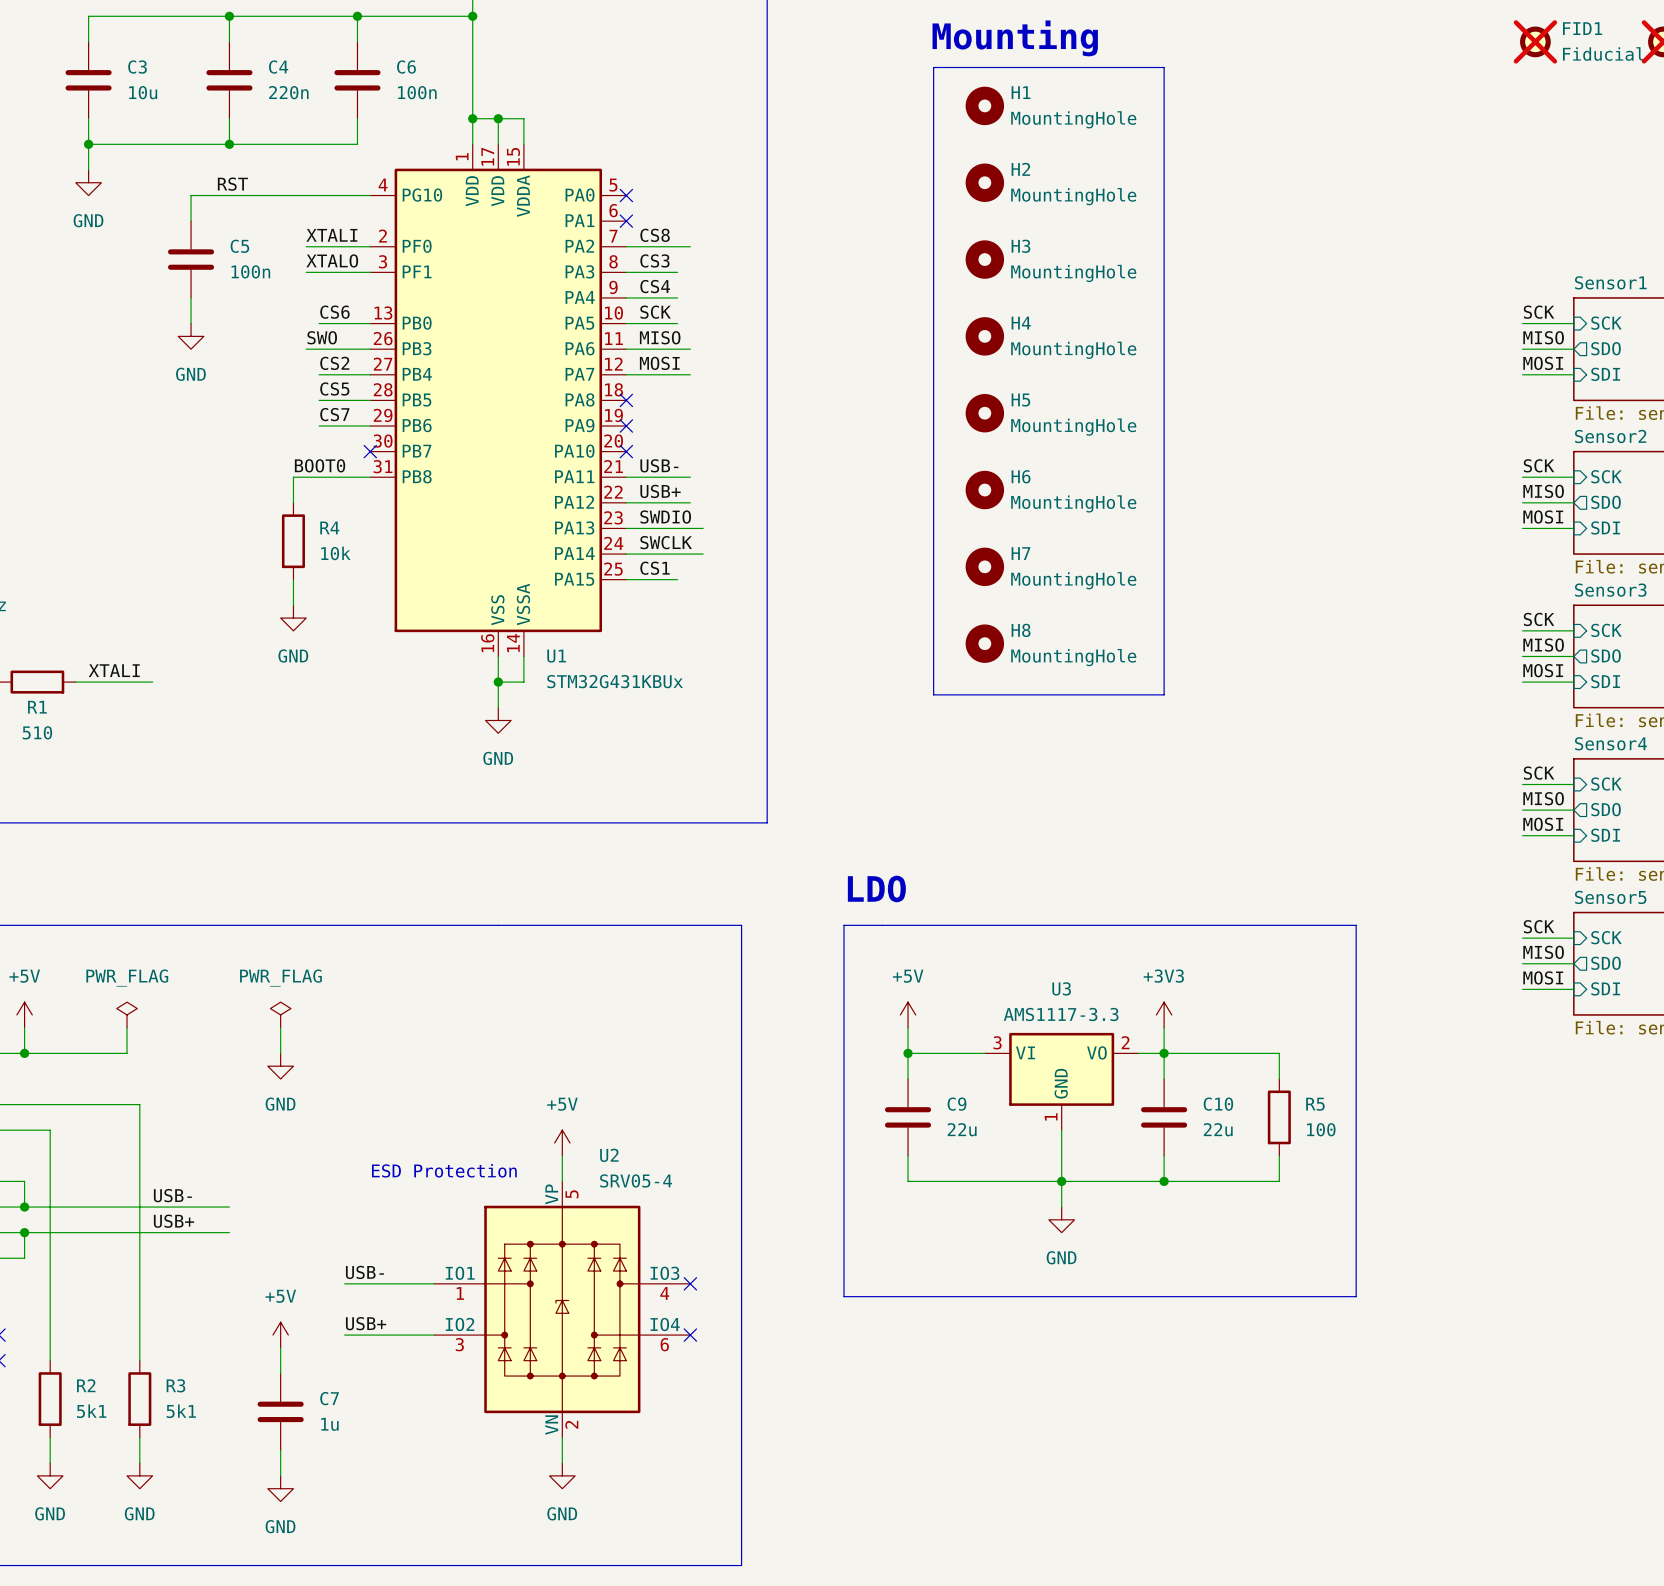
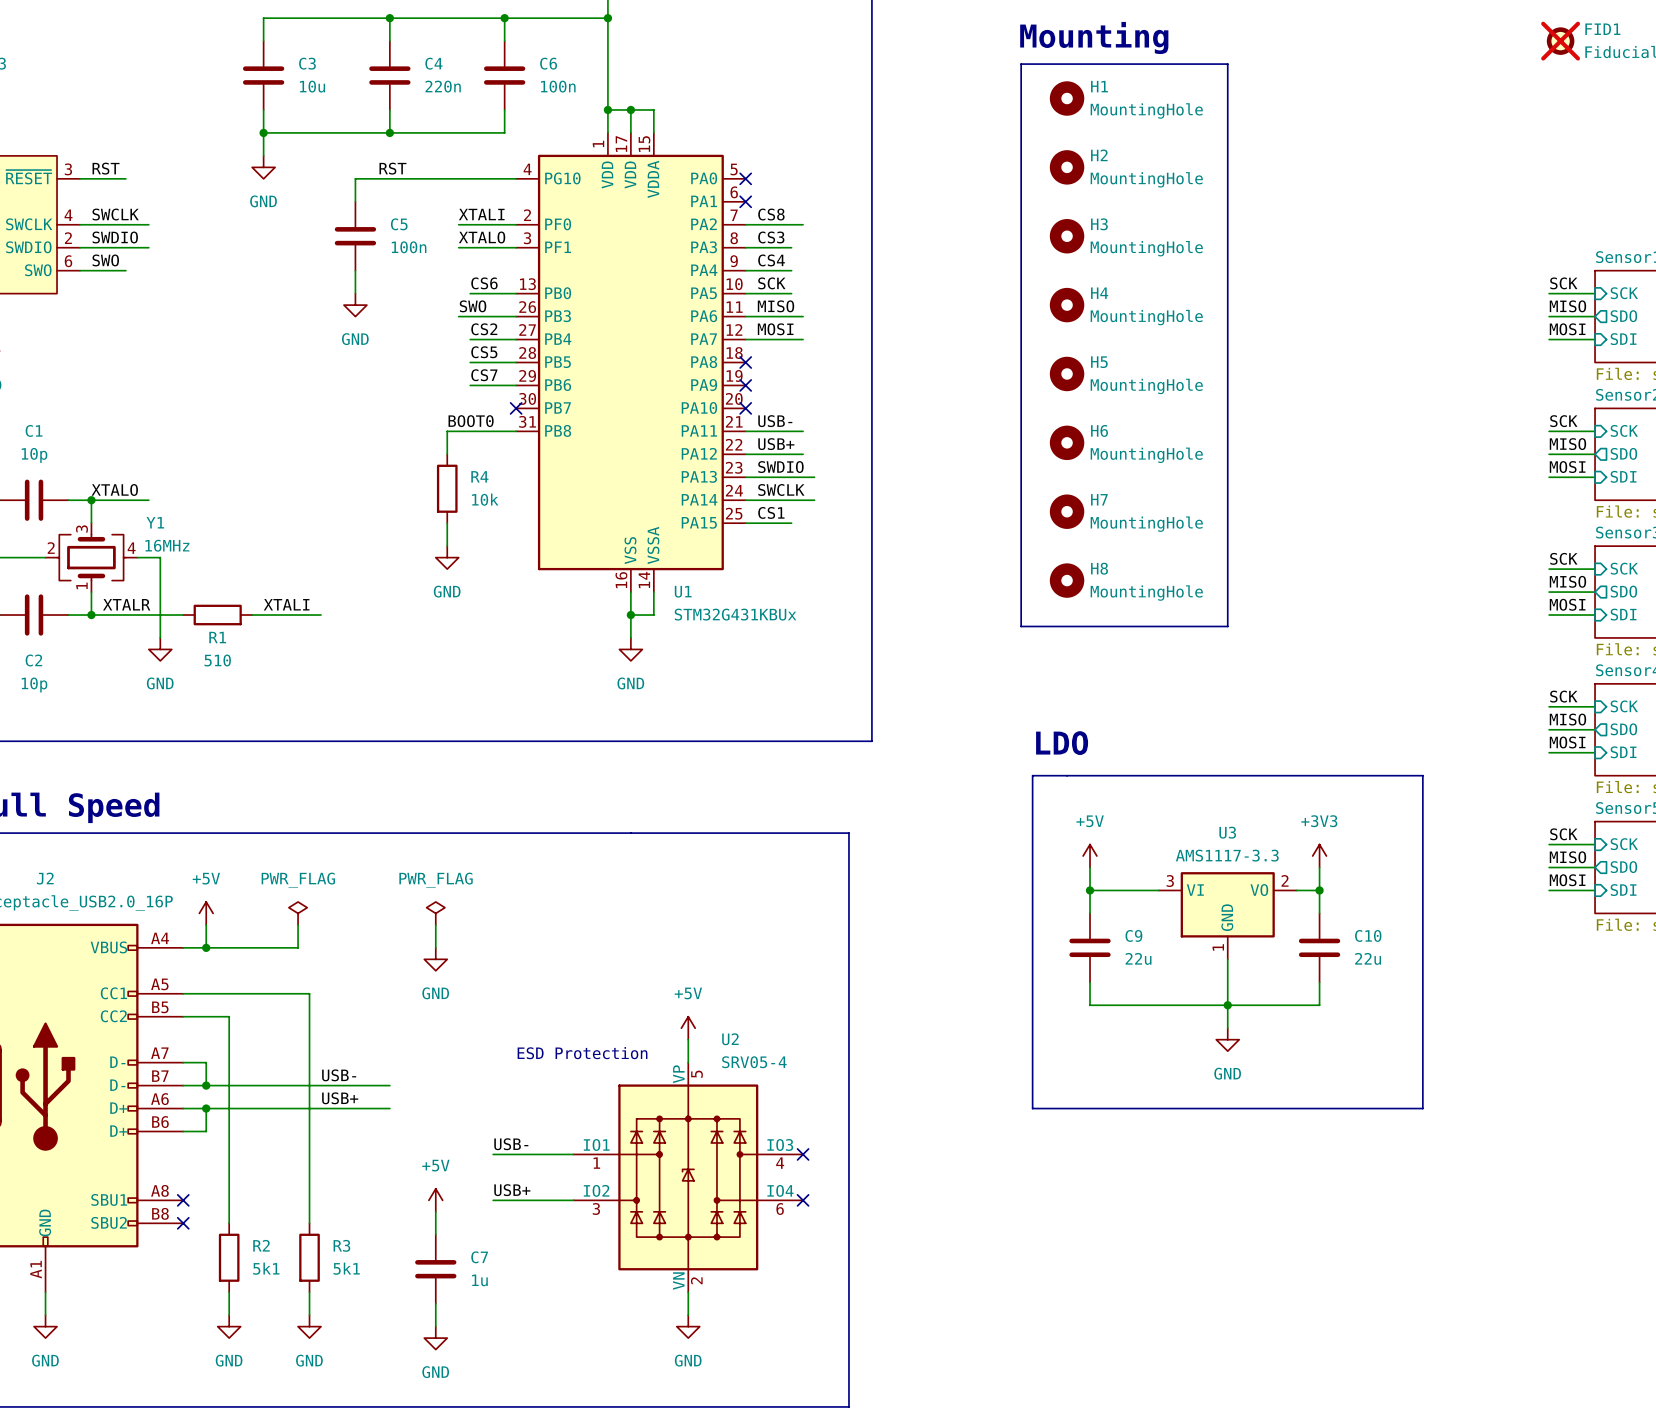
text position: LDO (876, 888) -> LDO (1062, 743)
line: (844, 925) (1356, 925) (1356, 1296) (844, 1296) (844, 925) -> (1032, 775) (1032, 1108) (1422, 1108) (1422, 775) (1032, 775)
wire: none -> (1319, 867) (1319, 913)
junction: none -> (1090, 890)
wire: none -> (1296, 890) (1319, 890)
junction: none -> (1319, 890)
power symbol position: +5V (908, 1014) -> +5V (1090, 856)
power symbol position: +3V3 (1164, 1014) -> +3V3 (1319, 856)
wire: (908, 1027) (908, 1078) -> (1090, 867) (1090, 913)
wire: (908, 1053) (984, 1053) -> (1090, 890) (1158, 890)
junction: (908, 1053) -> none
wire: (1138, 1053) (1279, 1053) (1279, 1078) -> none
junction: (1164, 1053) -> none
U3 position: (1061, 1081) -> (1227, 915)
wire: none -> (1090, 982) (1090, 1005) (1319, 1005) (1319, 982)
C9 position: (908, 1117) -> (1090, 947)
junction: none -> (1227, 1005)
C10 position: (1164, 1117) -> (1319, 947)
R5: 100 (1279, 1117) -> none
wire: (1061, 1130) (1061, 1207) -> none
wire: (908, 1155) (908, 1181) (1279, 1181) (1279, 1155) -> none
wire: (1164, 1155) (1164, 1181) -> none
junction: (1061, 1181) -> none
junction: (1164, 1181) -> none
power symbol position: GND (1061, 1219) -> GND (1227, 1039)

